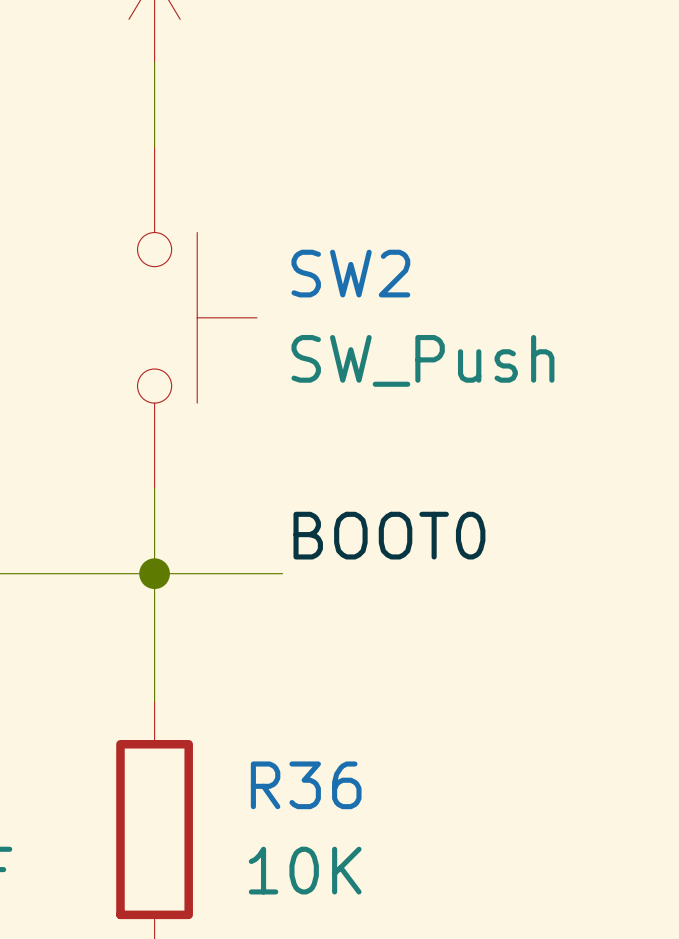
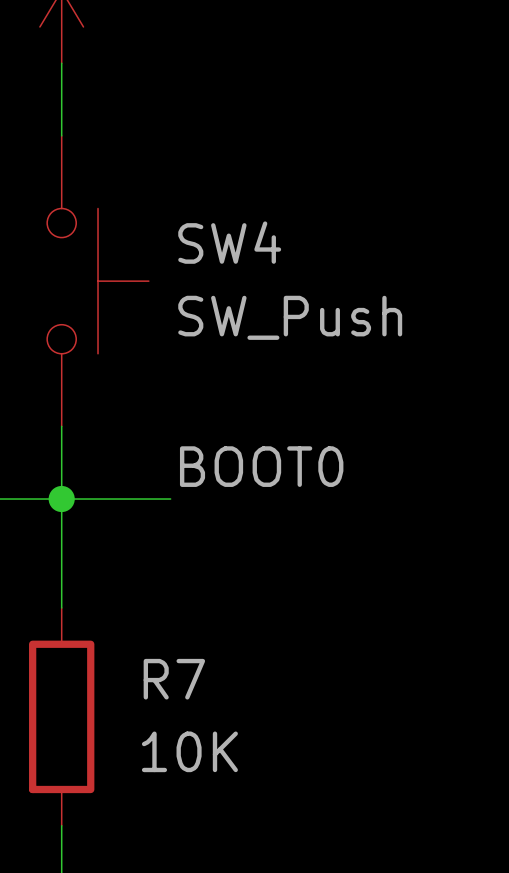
SW2 name: SW2 (350, 273) -> SW4 (229, 242)
R36 name: R36 (306, 785) -> R7 (174, 679)

